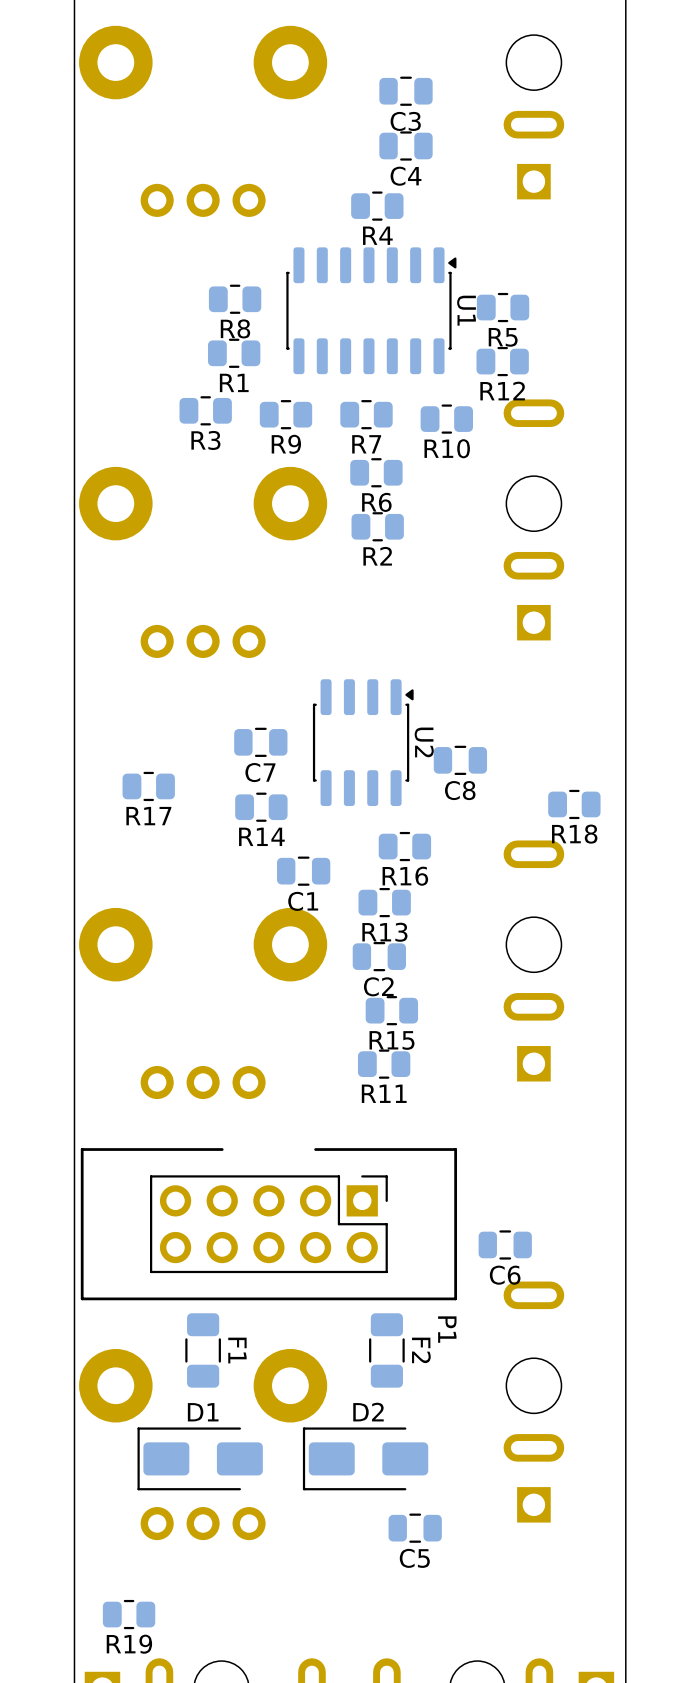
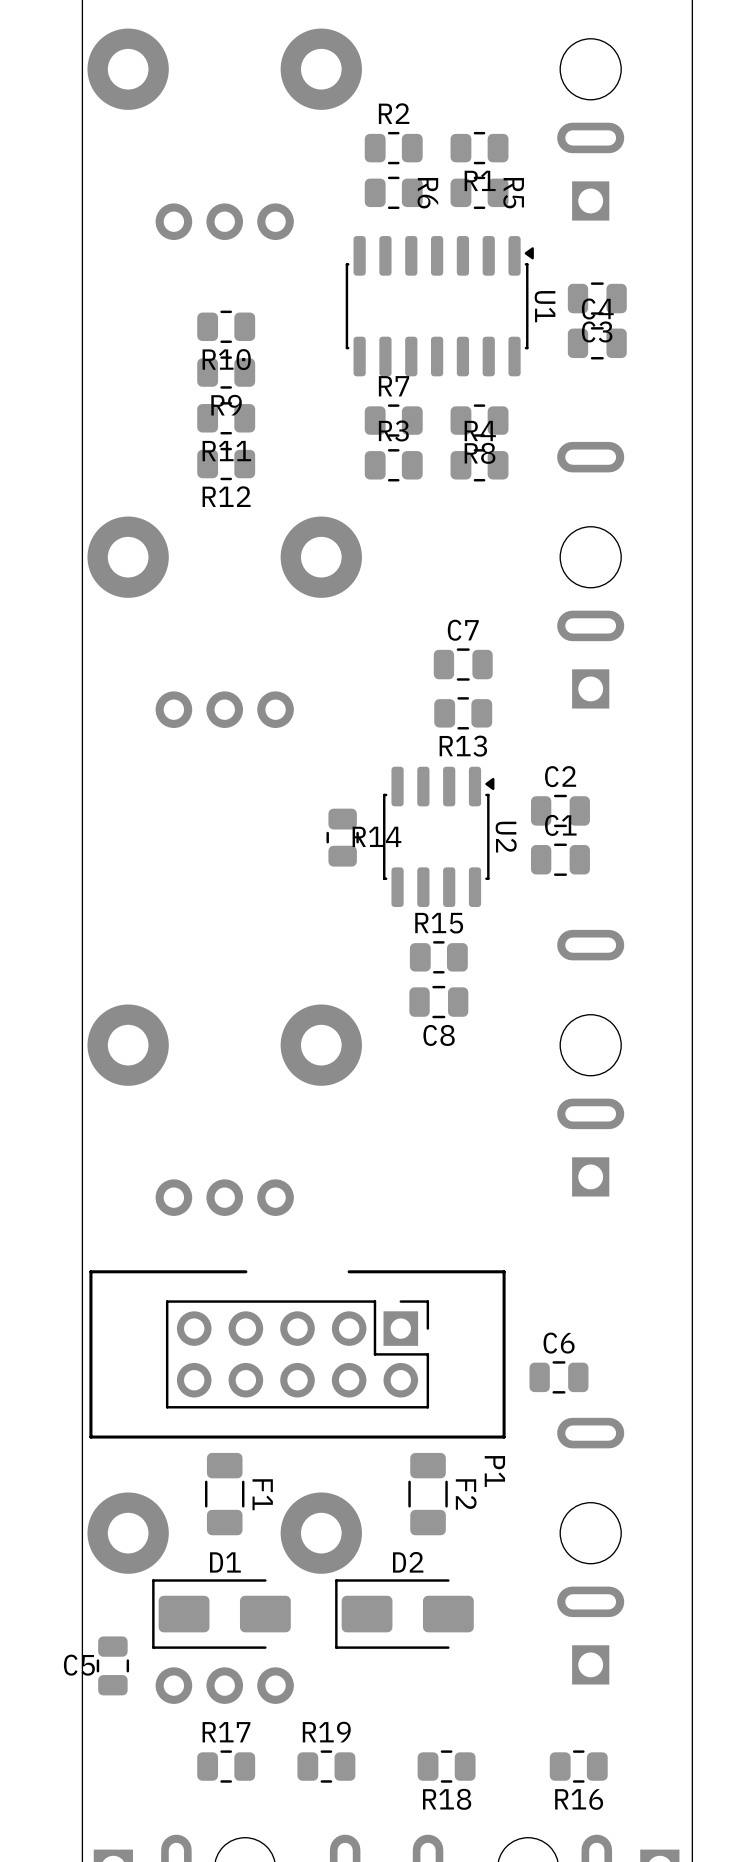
C3 position: (406, 91) -> (597, 298)
C4 position: (406, 146) -> (597, 343)
C4 name position: C4 (406, 176) -> C4 (597, 308)
R4 position: (377, 206) -> (479, 465)
R4 name position: R4 (377, 235) -> R4 (480, 430)
R8 position: (235, 299) -> (479, 420)
R5 position: (503, 307) -> (479, 192)
U1 position: (371, 310) -> (439, 306)
R5 name rotation: 0° (503, 337) -> 90° clockwise (513, 193)
R1 position: (234, 353) -> (479, 148)
R12 position: (502, 361) -> (226, 464)
R3 position: (205, 410) -> (393, 465)
R9 position: (286, 414) -> (226, 372)
R7 position: (366, 414) -> (393, 420)
R10 position: (446, 419) -> (226, 326)
R3 name position: R3 (205, 440) -> R3 (393, 430)
R7 name position: R7 (366, 444) -> R7 (394, 386)
R6 position: (376, 472) -> (393, 192)
R6 name rotation: 0° (376, 502) -> 90° clockwise (427, 193)
R2 position: (377, 526) -> (393, 148)
R2 name position: R2 (377, 556) -> R2 (394, 113)
C7 position: (260, 742) -> (463, 664)
U2 position: (363, 742) -> (438, 836)
C8 position: (460, 760) -> (438, 1002)
C7 name position: C7 (260, 772) -> C7 (463, 630)
R17 position: (148, 786) -> (226, 1766)
R18 position: (574, 804) -> (446, 1766)
R14 rotation: 0° (261, 807) -> 90° clockwise (342, 837)
R14 position: (261, 807) -> (342, 837)
R17 name position: R17 (148, 816) -> R17 (226, 1732)
R14 name position: R14 (261, 836) -> R14 (376, 836)
R16 position: (404, 846) -> (578, 1766)
C1 position: (303, 871) -> (560, 859)
C1 name position: C1 (303, 901) -> C1 (560, 825)
R13 position: (384, 902) -> (463, 713)
C2 position: (379, 956) -> (560, 810)
C2 name position: C2 (378, 986) -> C2 (560, 776)
R15 position: (391, 1010) -> (438, 957)
R15 name position: R15 (391, 1040) -> R15 (439, 923)
R11 position: (384, 1064) -> (226, 418)
C6 name position: C6 (505, 1275) -> C6 (559, 1343)
C5 rotation: 0° (415, 1528) -> 90° clockwise (112, 1665)
C5 position: (415, 1528) -> (112, 1665)
R19 position: (129, 1614) -> (326, 1766)
R19 name position: R19 (129, 1644) -> R19 (326, 1732)

